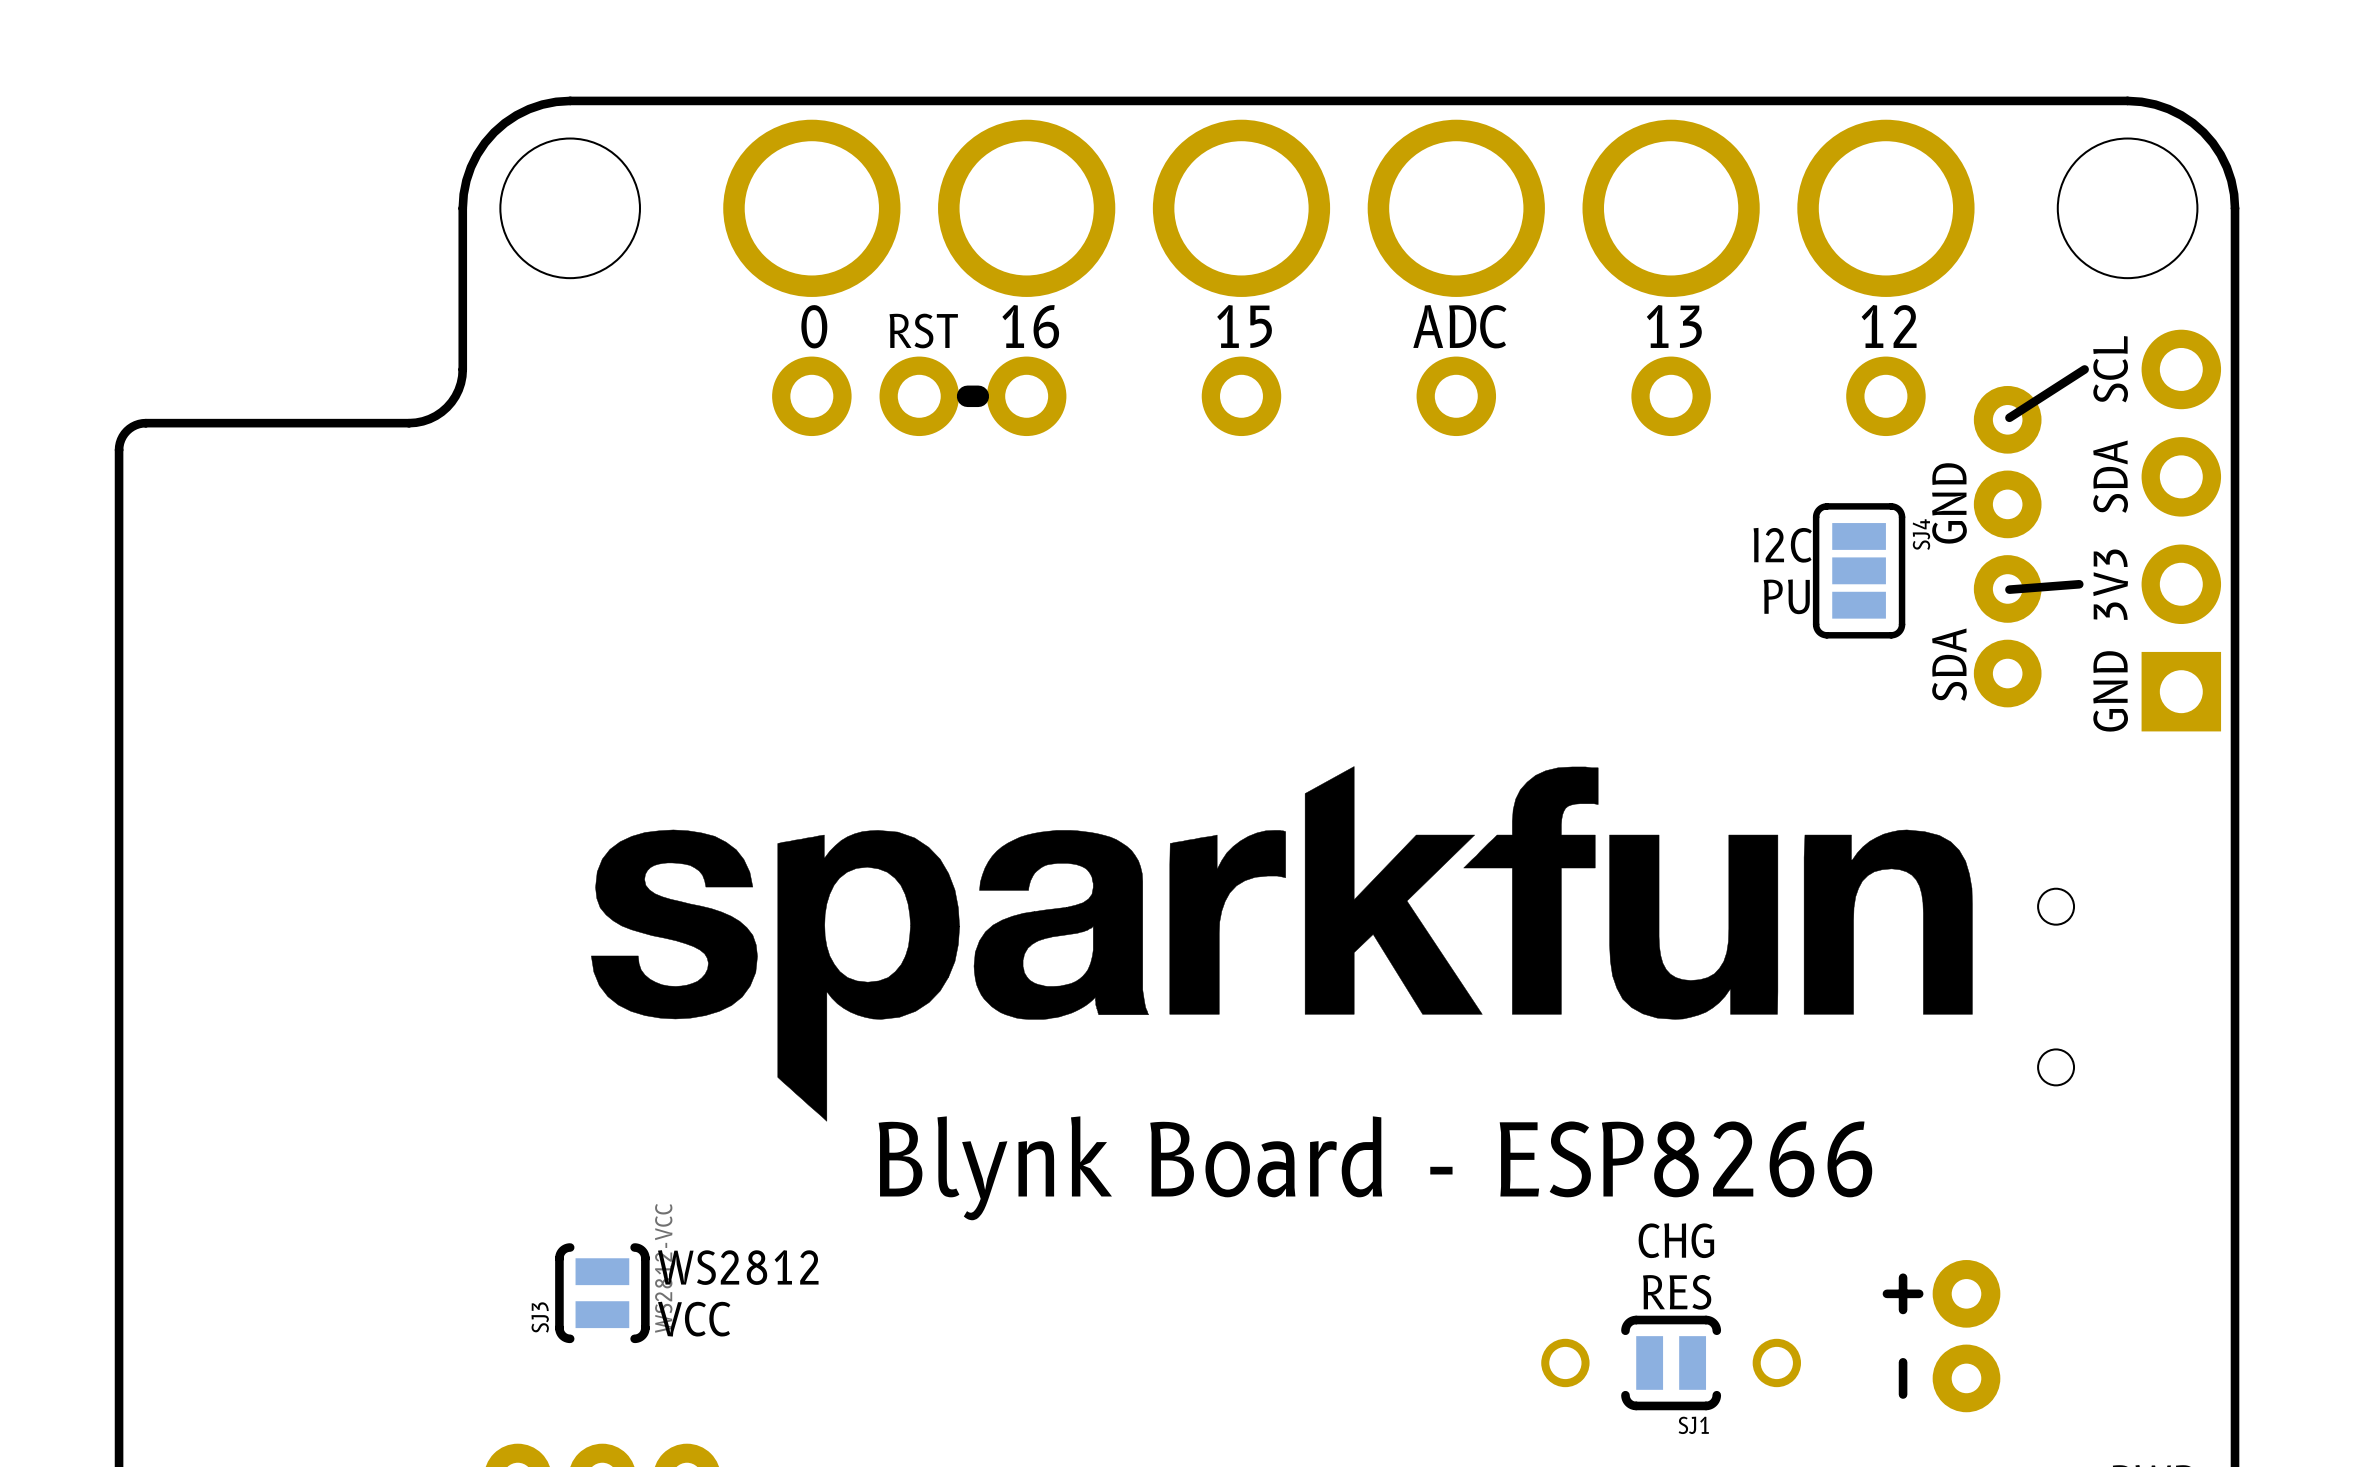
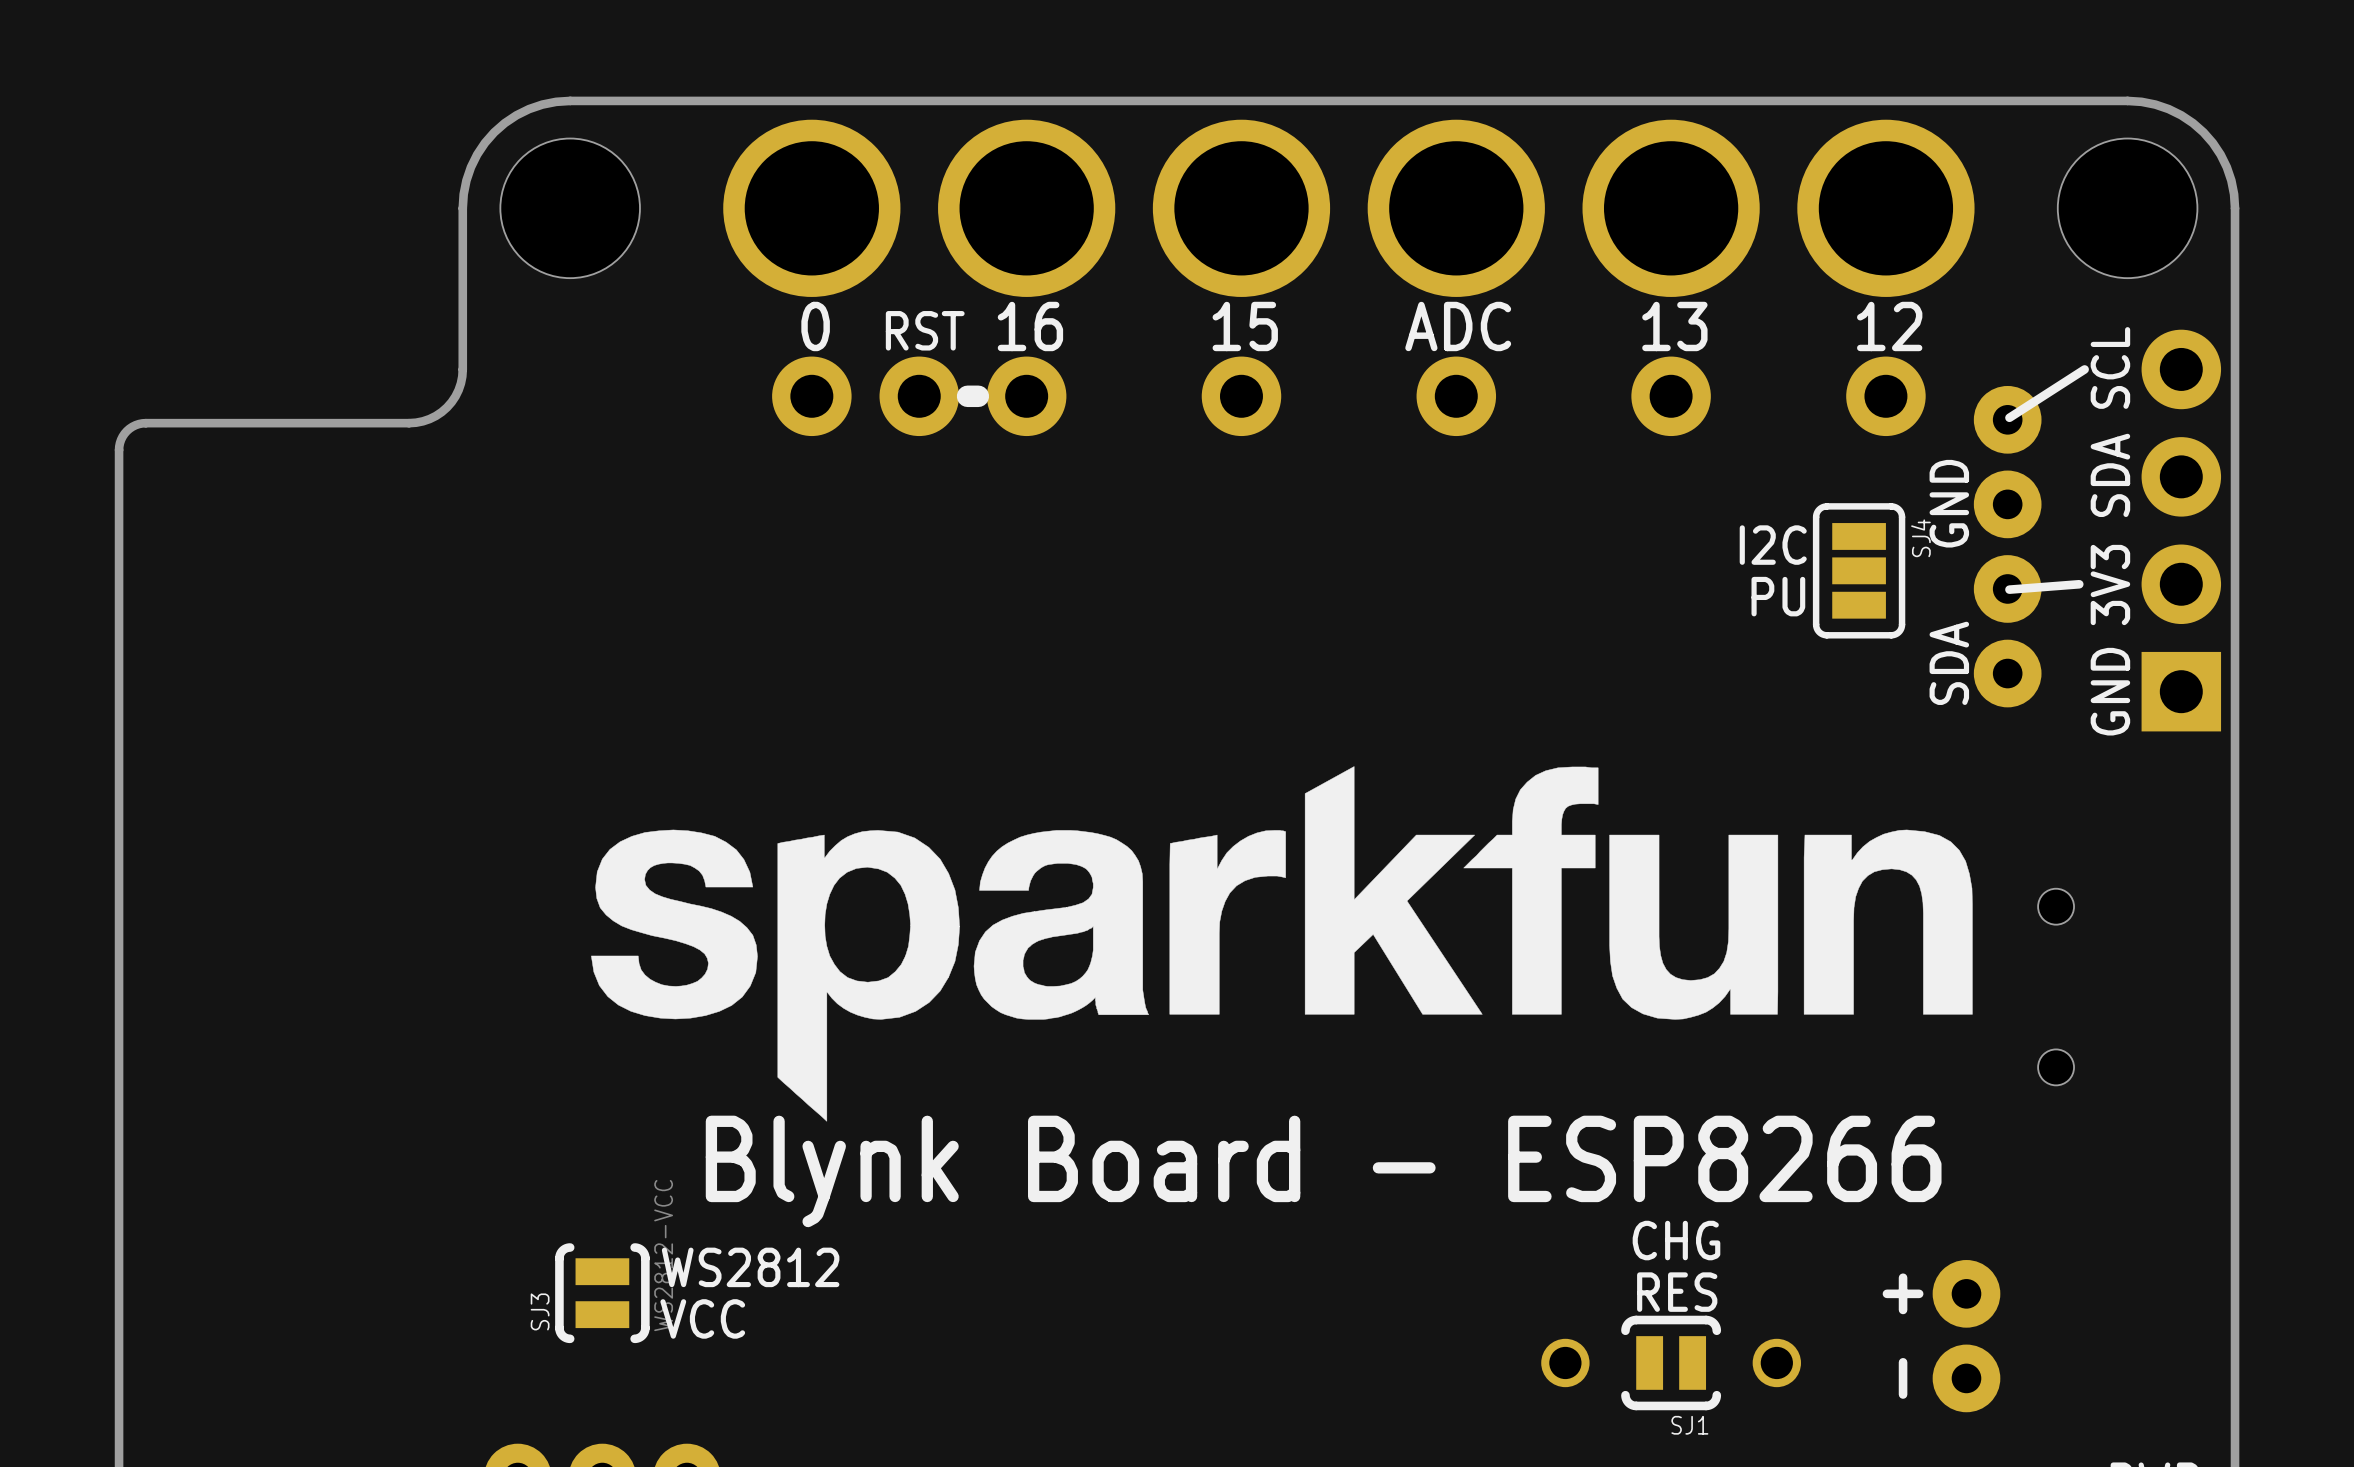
text position: Blynk Board - ESP8266 (1375, 1168) -> Blynk Board - ESP8266 (1323, 1171)

